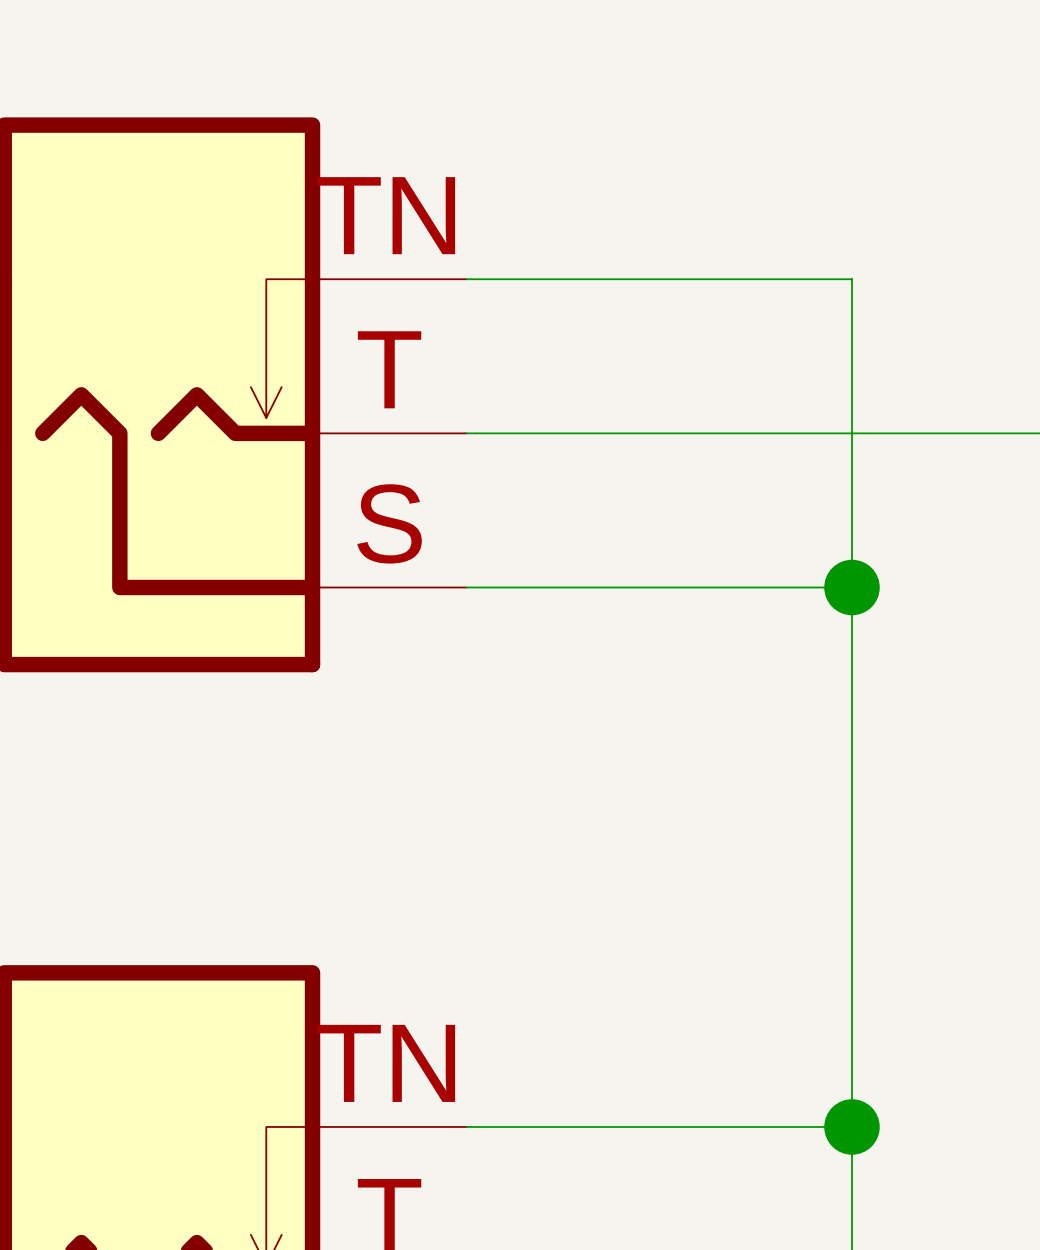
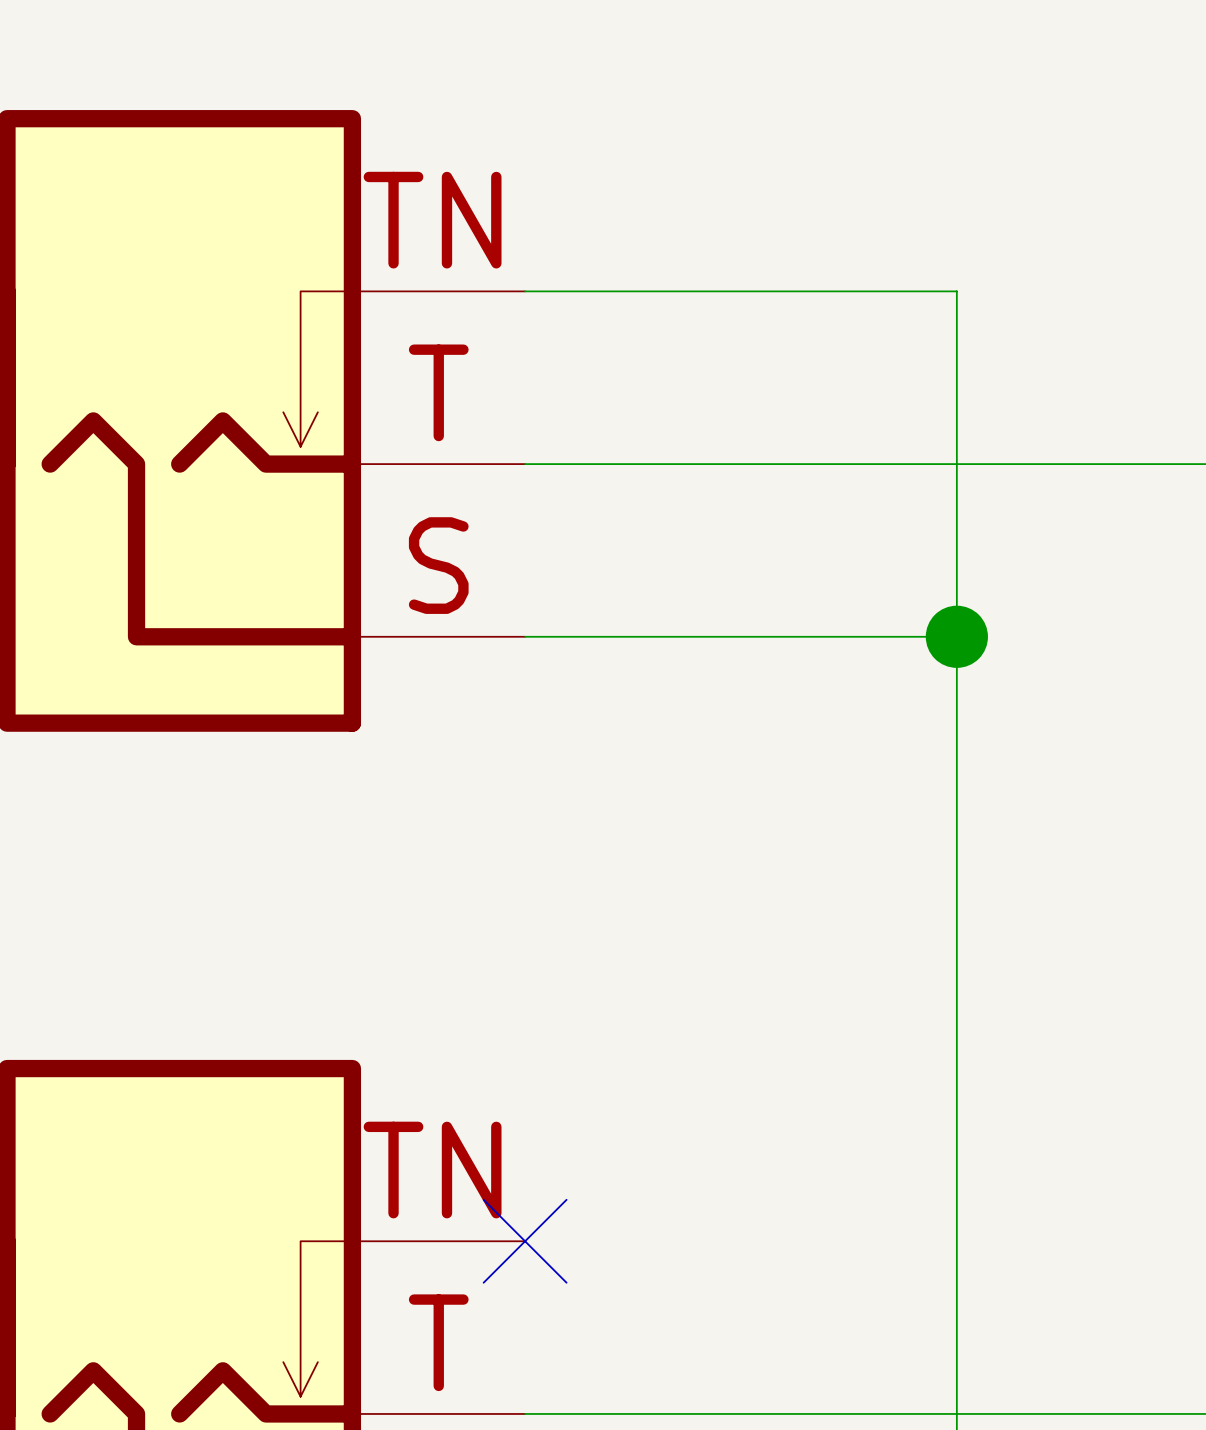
wire: (466, 1126) (851, 1126) -> none
no-connect mark: none -> (525, 1241)
junction: (851, 1126) -> none

